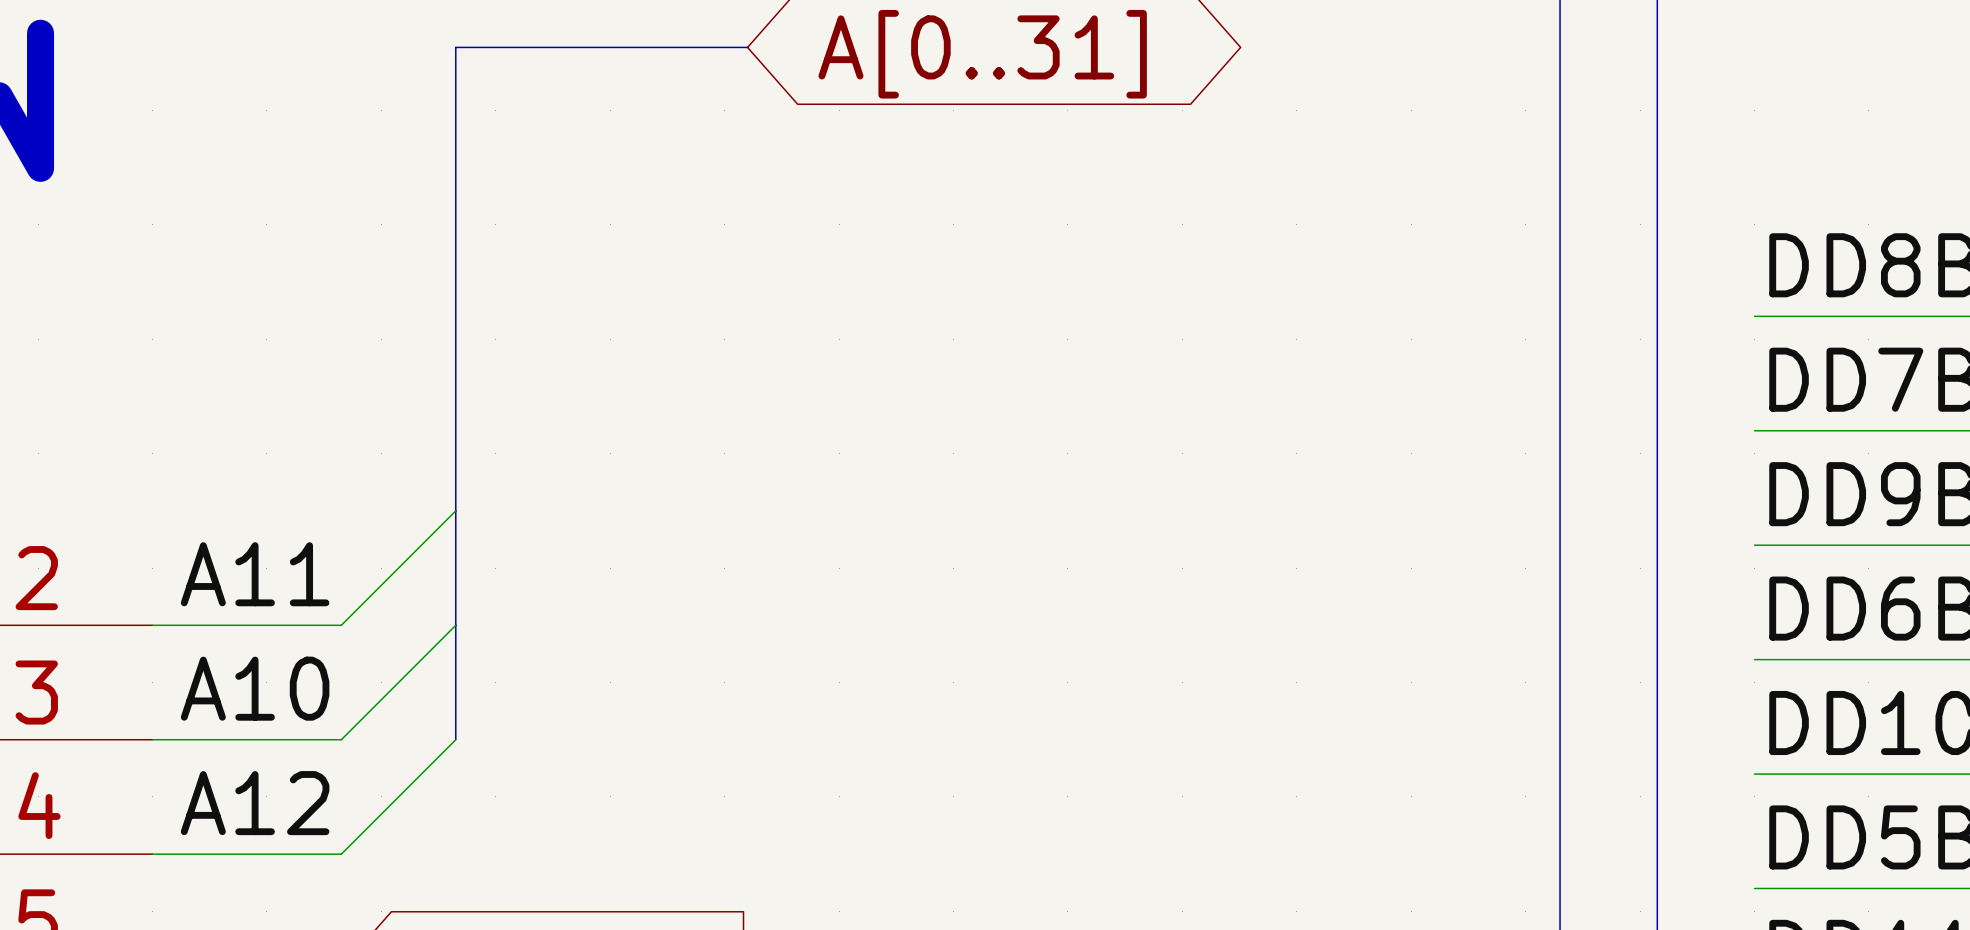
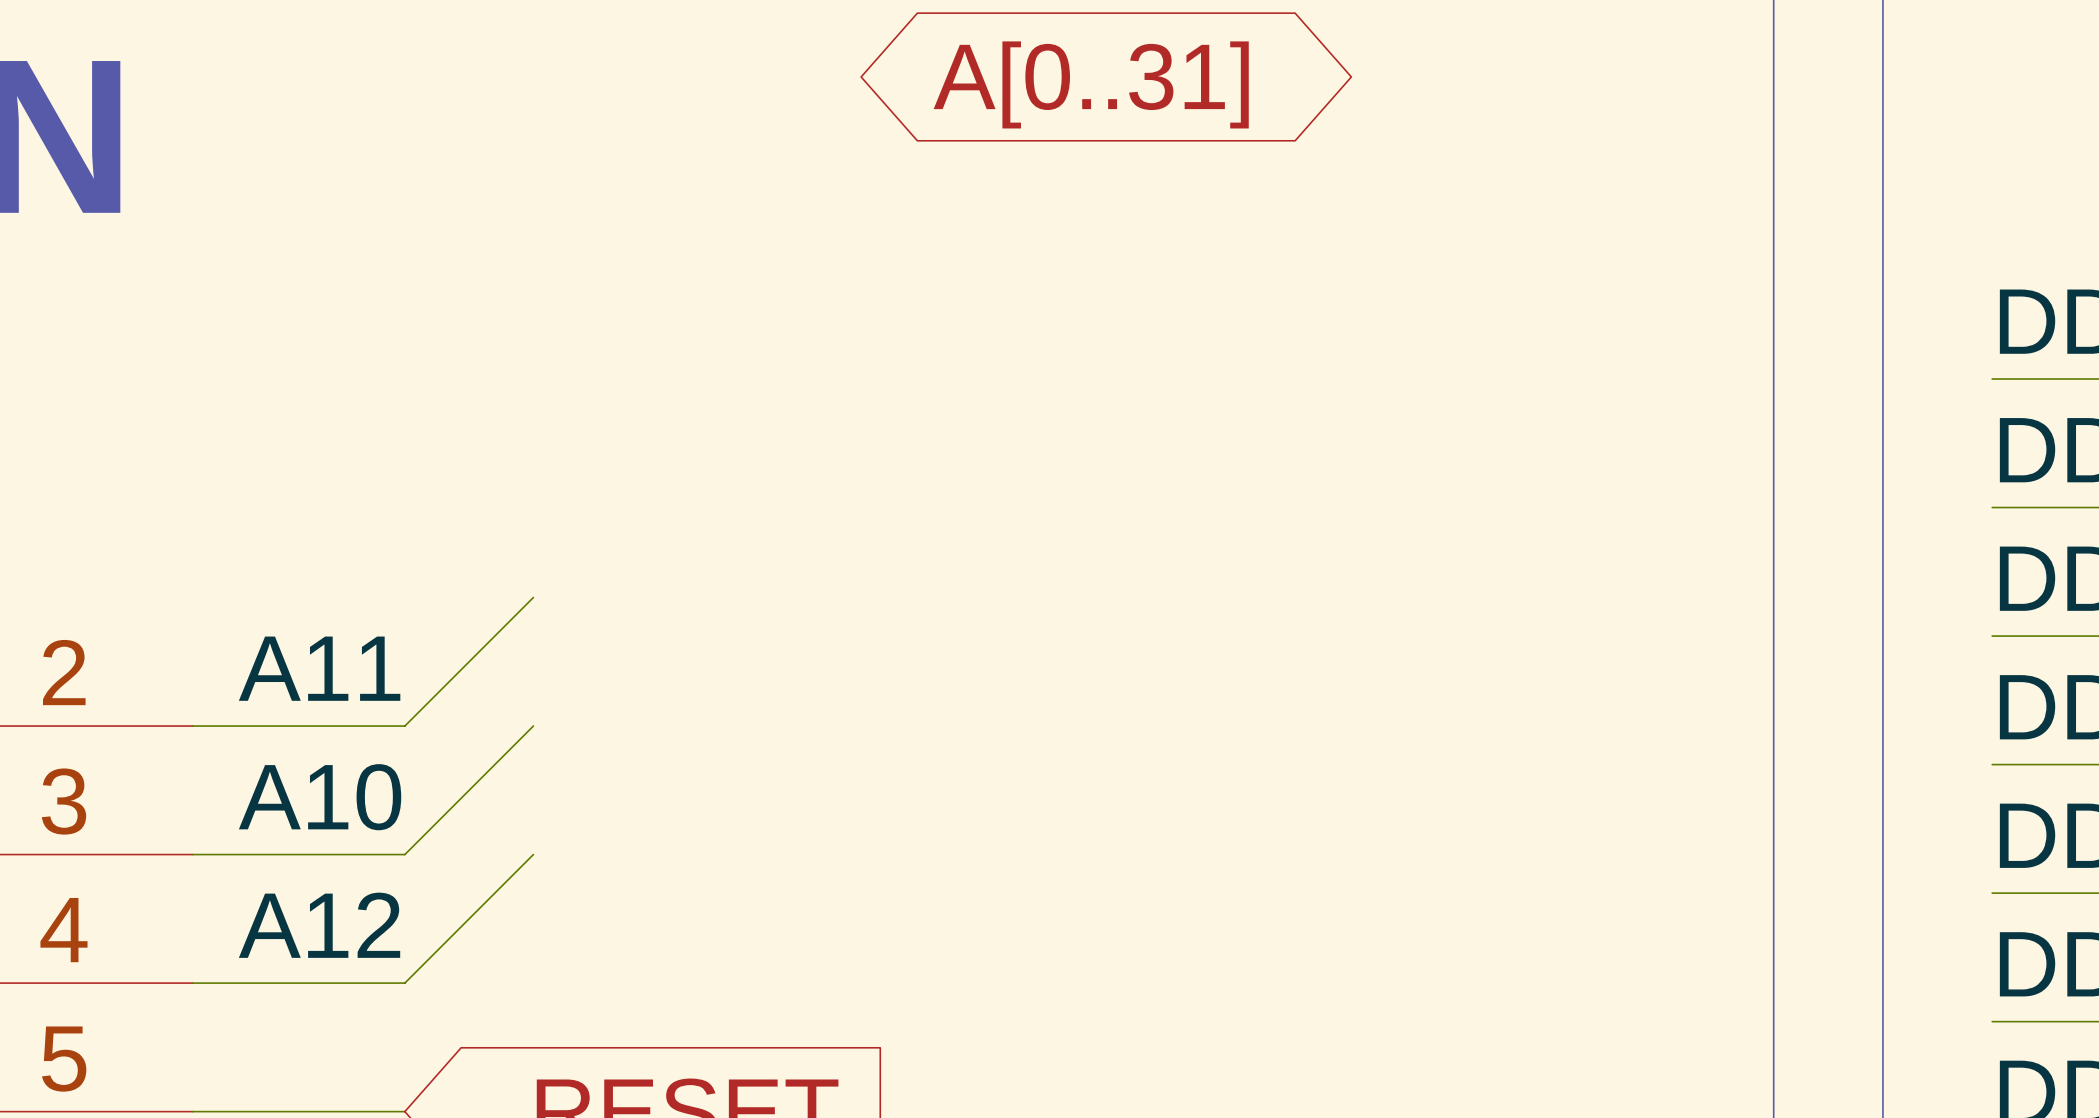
bus: (747, 47) (455, 47) (455, 739) -> none

